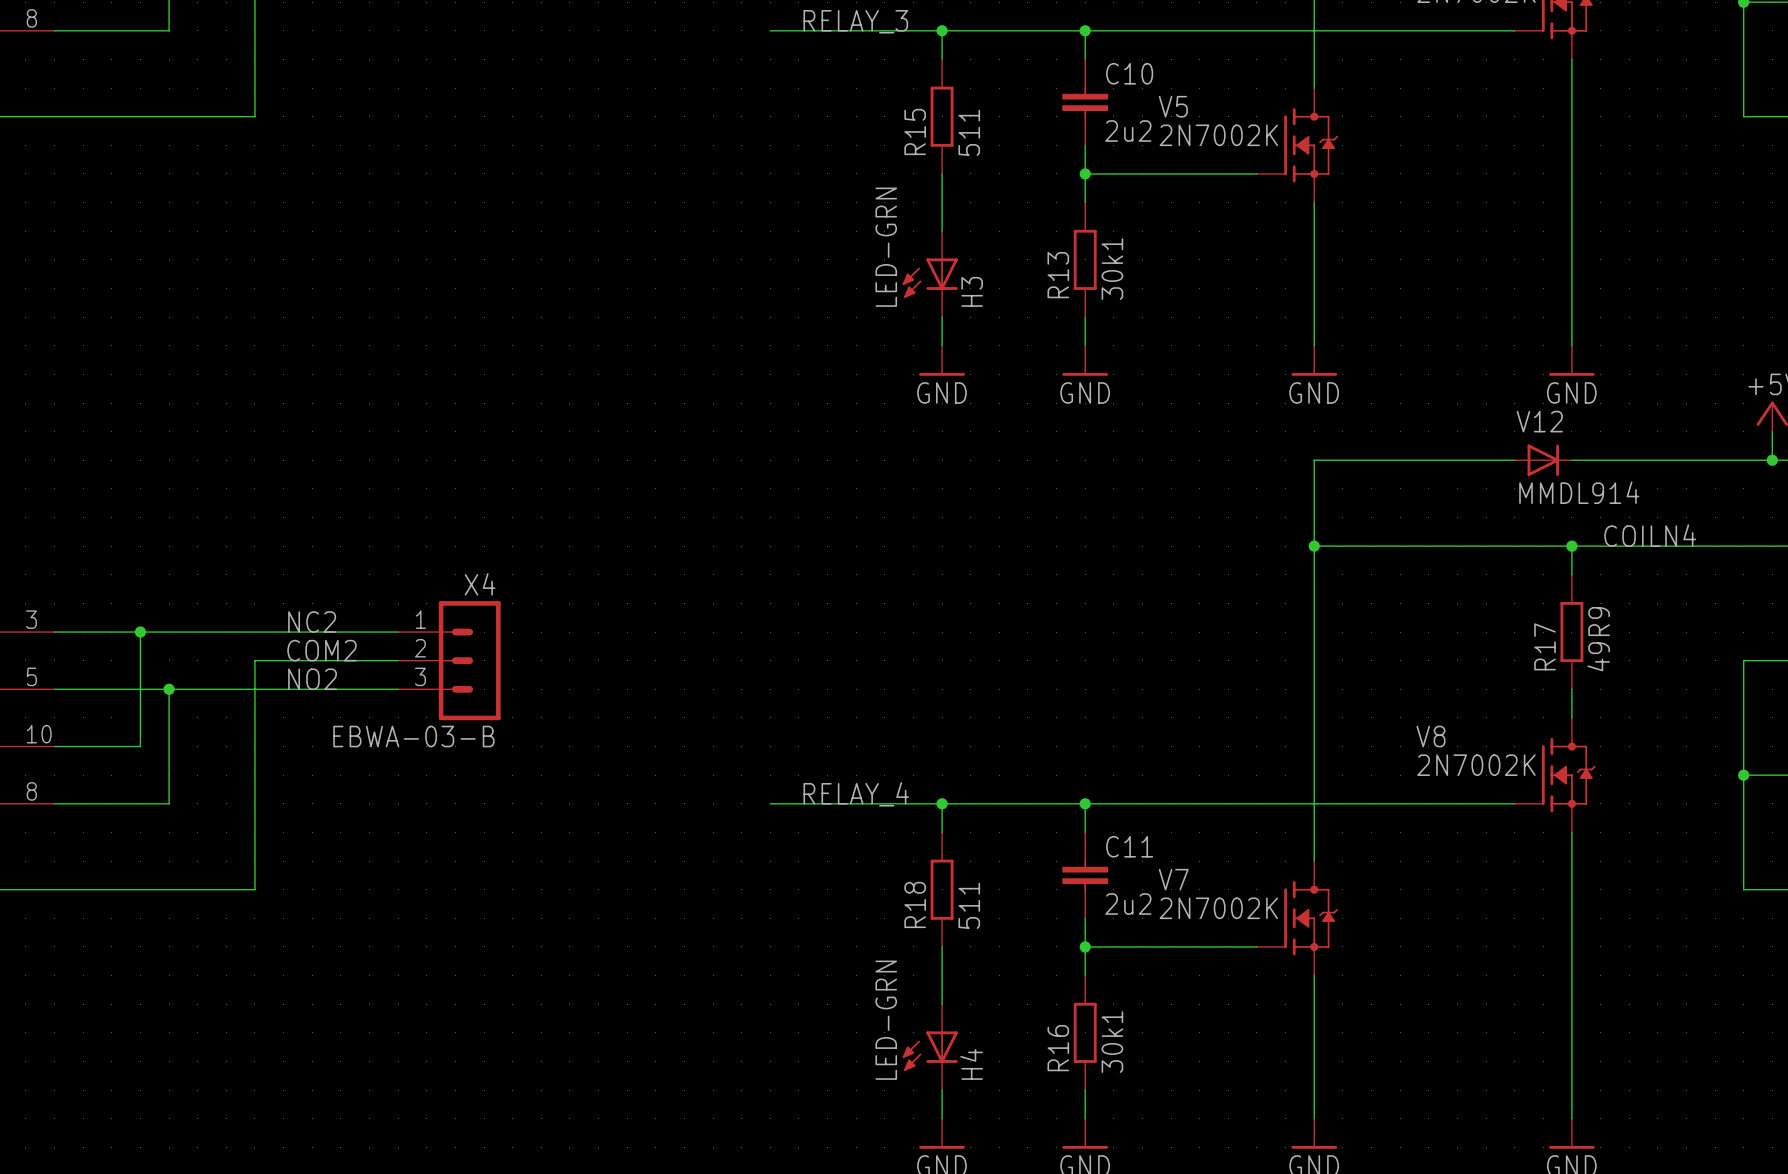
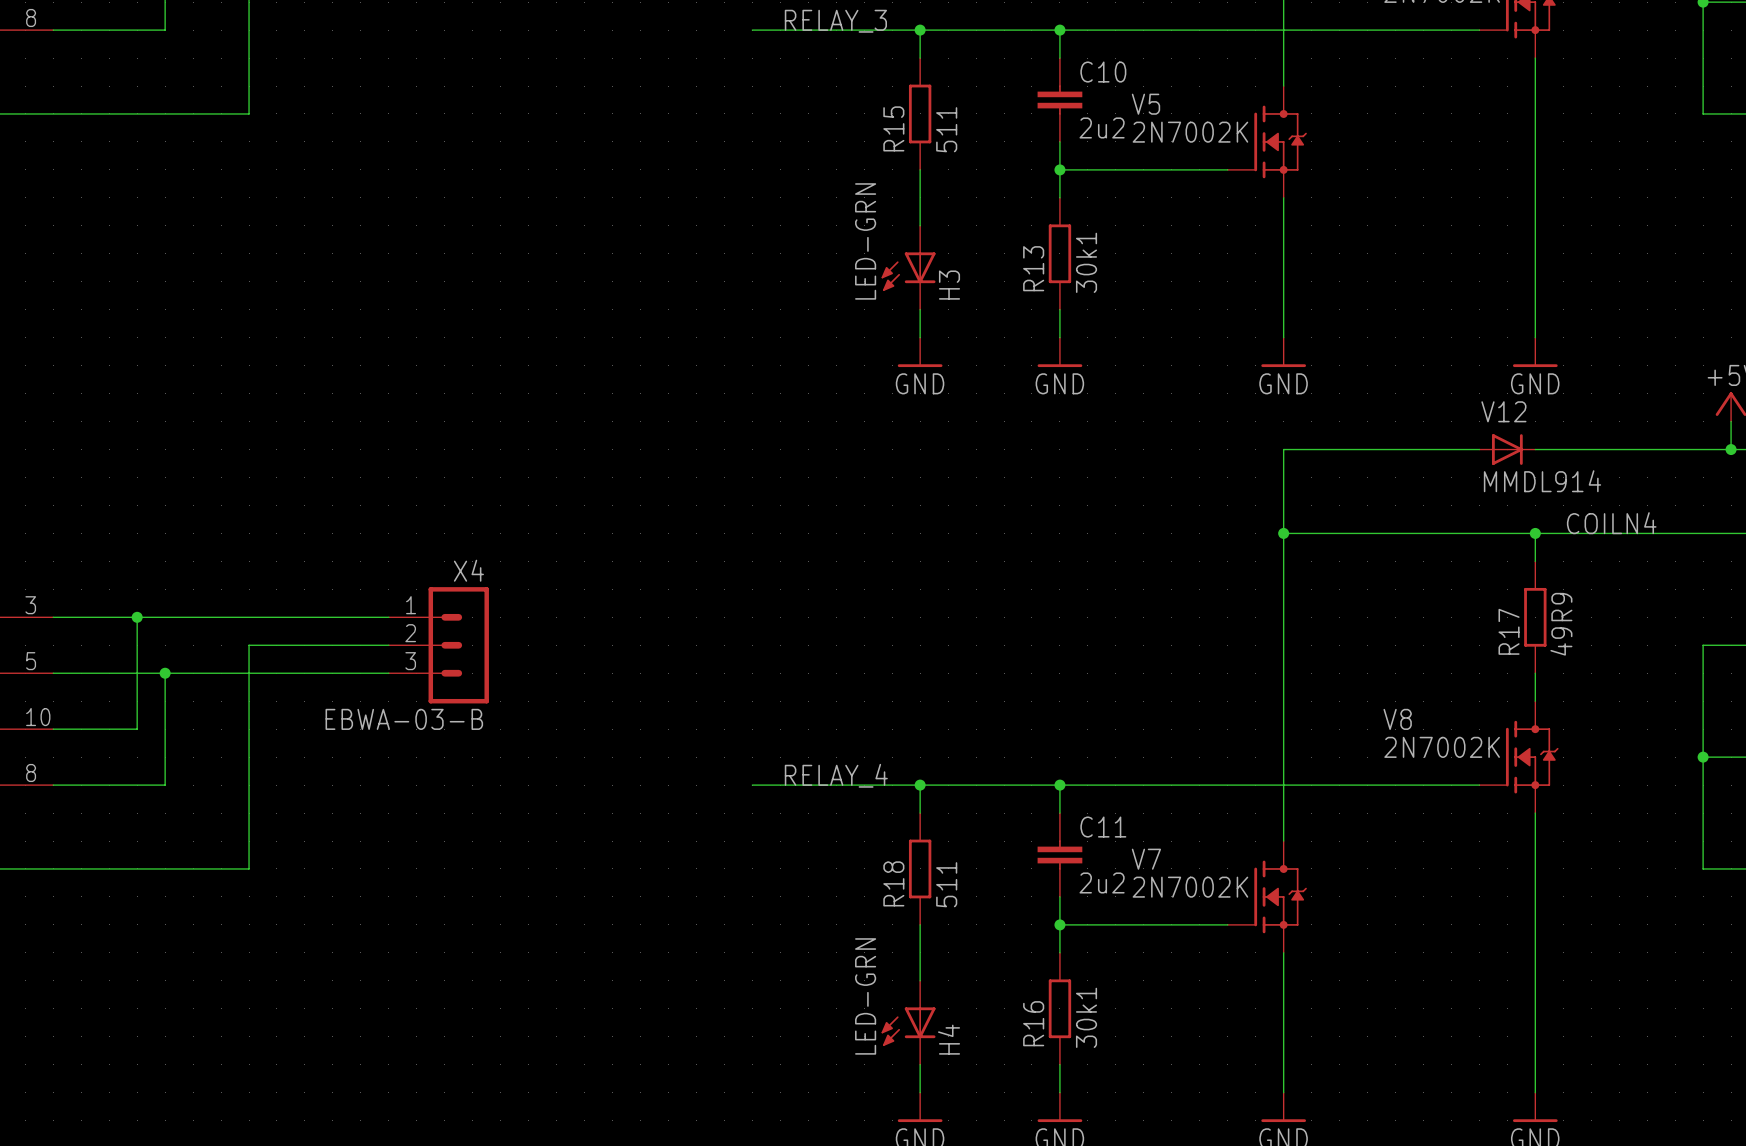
label: NC2 (312, 622) -> none
label: COM2 (322, 650) -> none
label: NO2 (312, 679) -> none

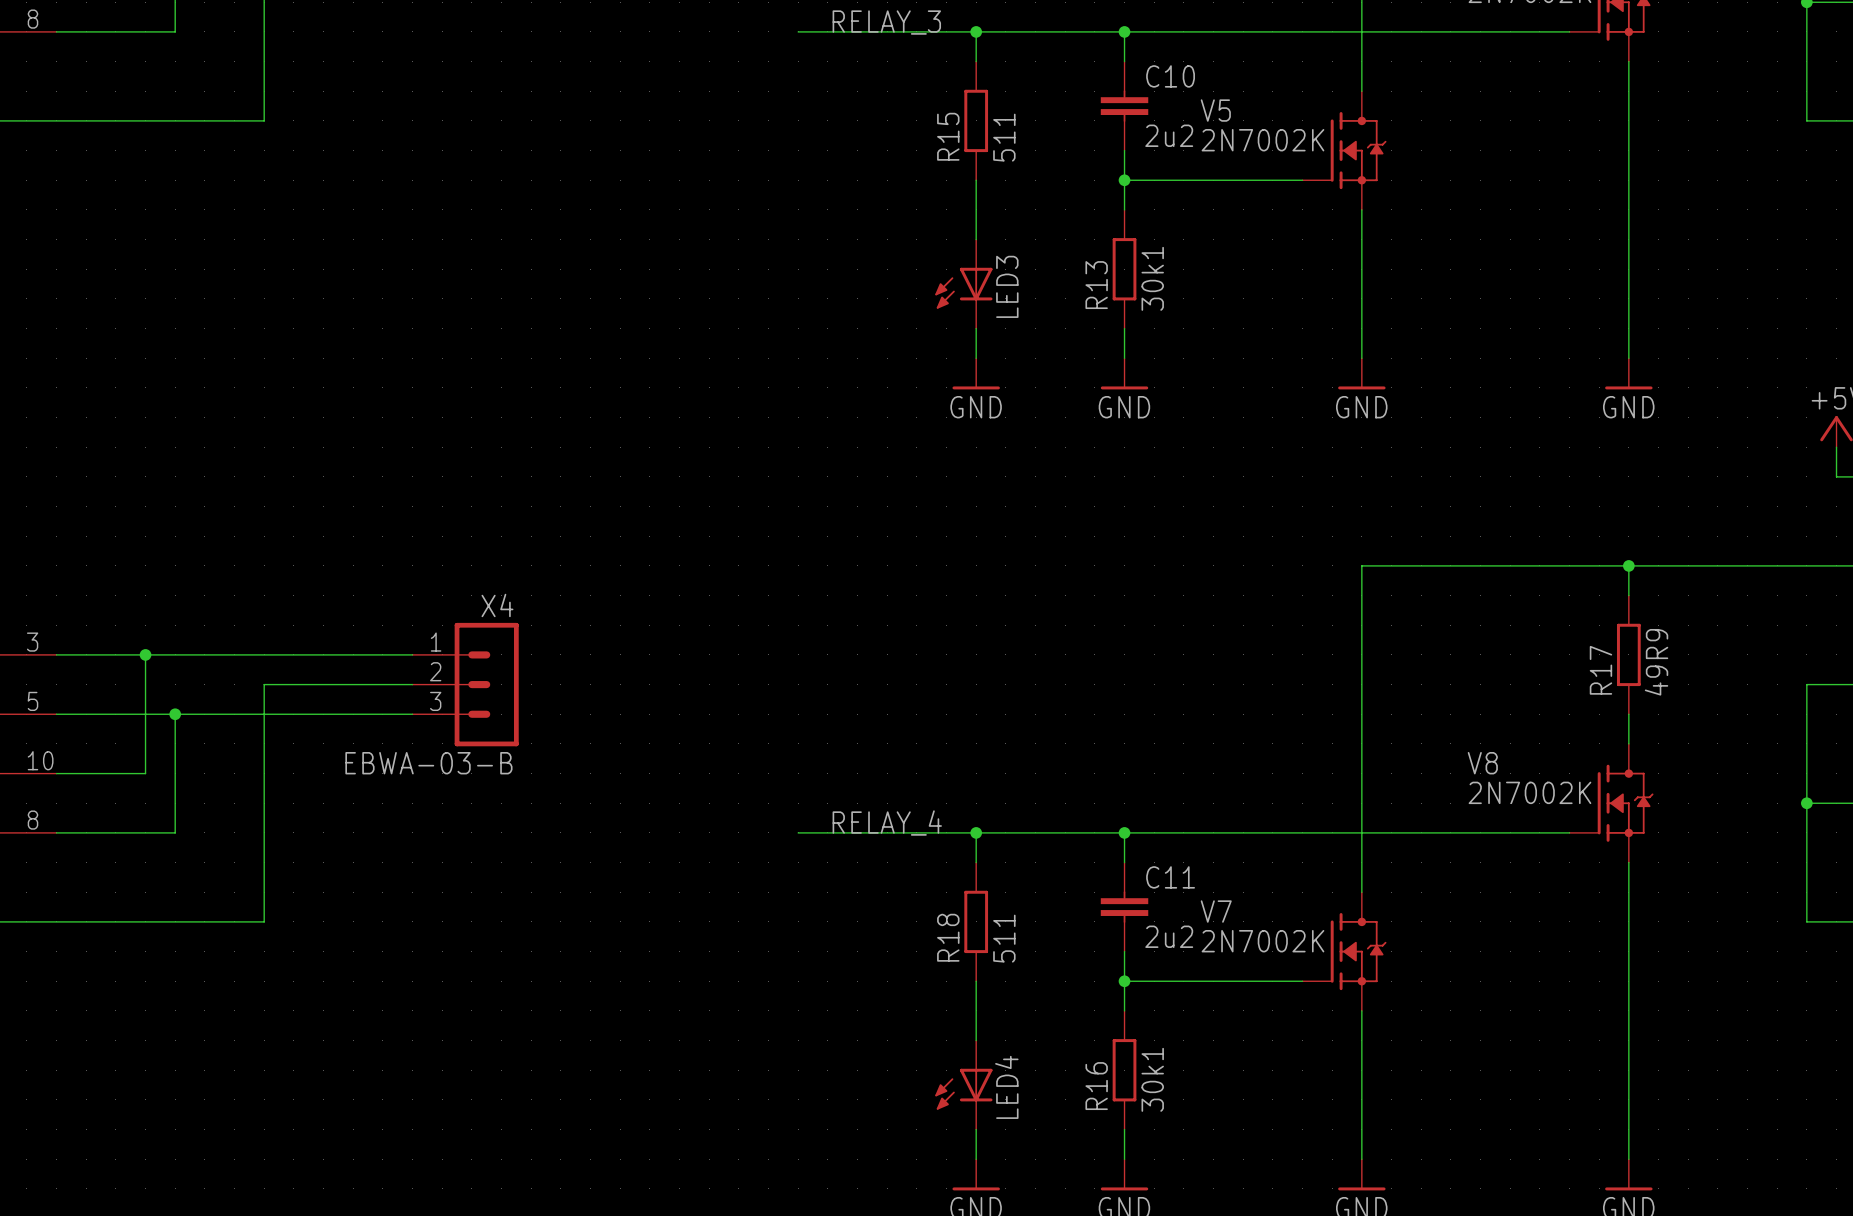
H3 value: LED-GRN (865, 241) -> none
H3 name: H3 (949, 285) -> LED3 (1007, 286)
wire: (1479, 449) (1283, 449) (1283, 533) -> none
V12: MMDL914 (1507, 449) -> none
wire: (1535, 449) (1731, 449) -> none
junction: (1731, 449) -> none
label: COILN4 (1611, 523) -> none
junction: (1283, 533) -> none
H4 value: LED-GRN (865, 996) -> none
H4 name: H4 (949, 1039) -> LED4 (1006, 1087)

